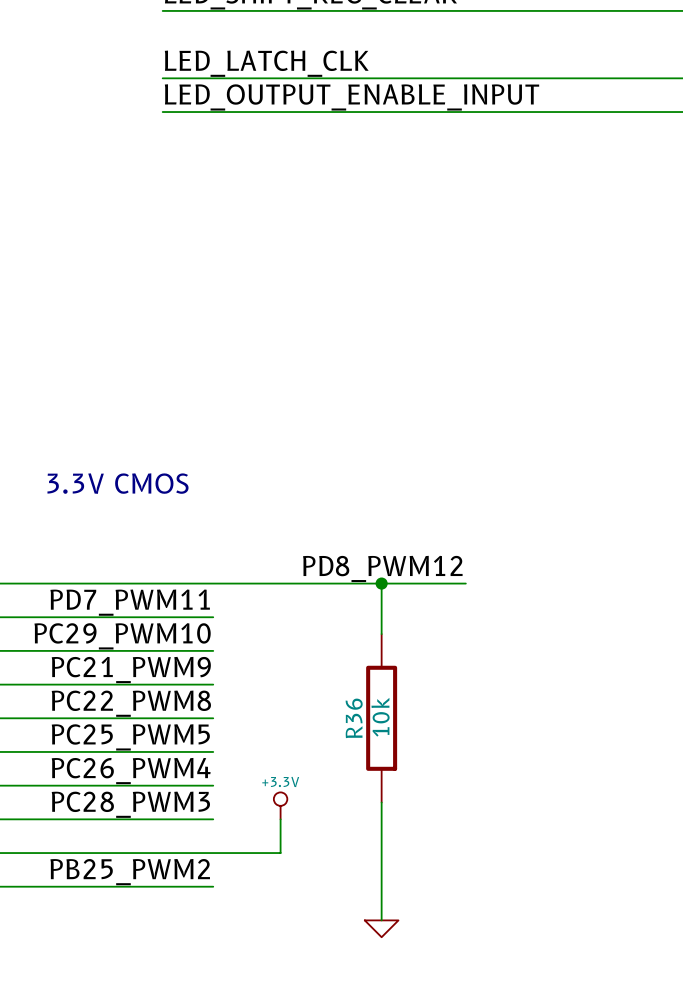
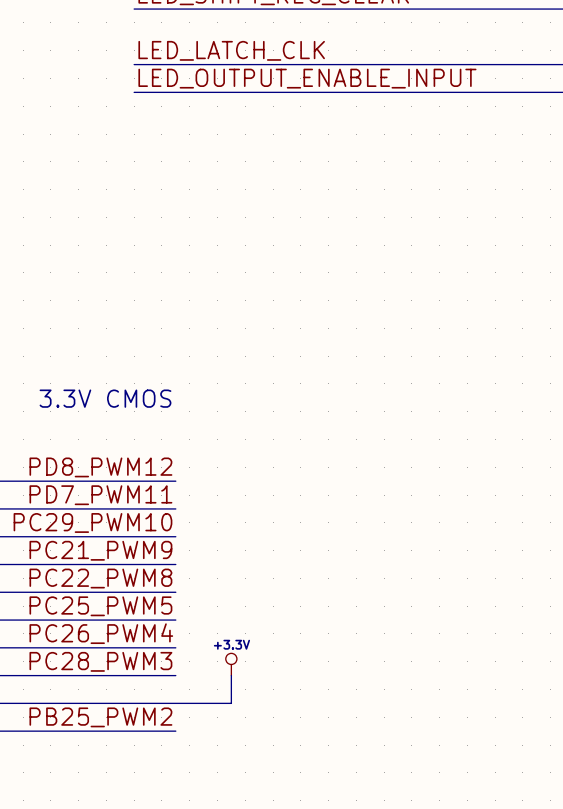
label position: PD8_PWM12 (382, 568) -> PD8_PWM12 (100, 467)
wire: (213, 583) (465, 583) -> none
wire: (381, 583) (381, 634) -> none
junction: (381, 583) -> none
R36: 10k (381, 718) -> none
wire: (381, 802) (381, 920) -> none
power symbol: (381, 928) -> none

